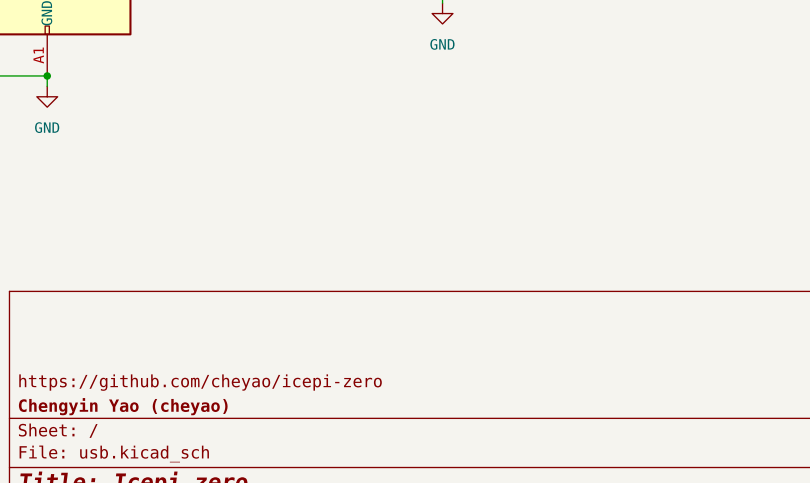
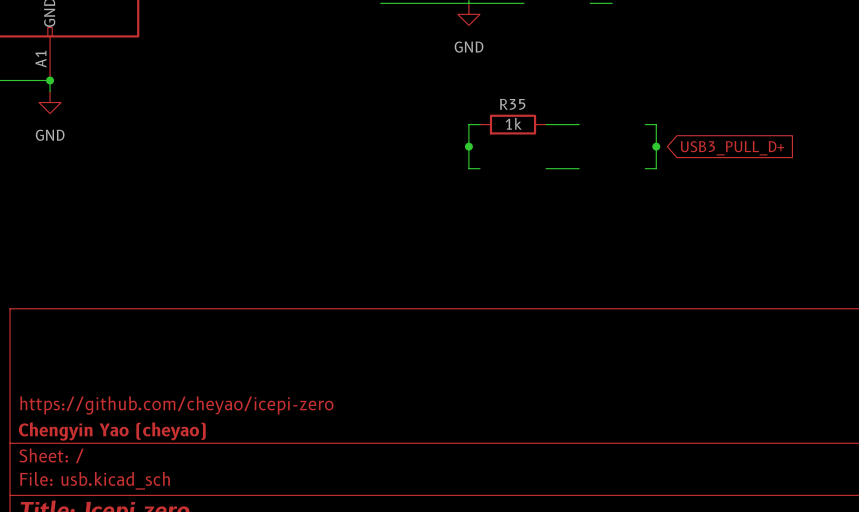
wire: none -> (380, 3) (524, 3)
wire: none -> (590, 3) (612, 3)
wire: none -> (479, 124) (468, 124) (468, 168) (479, 168)
R35: none -> 1k (513, 124)
wire: none -> (546, 124) (579, 124)
wire: none -> (645, 124) (656, 124) (656, 168) (645, 168)
junction: none -> (468, 146)
junction: none -> (656, 146)
global label: none -> USB3_PULL_D+ (732, 148)
wire: none -> (546, 168) (579, 168)

